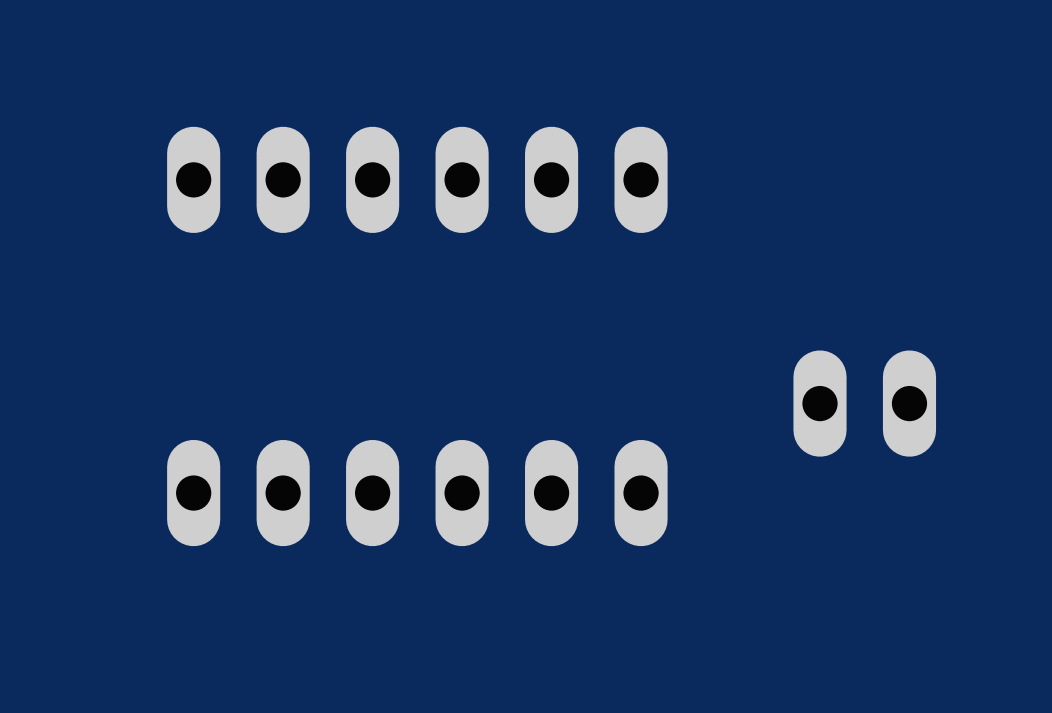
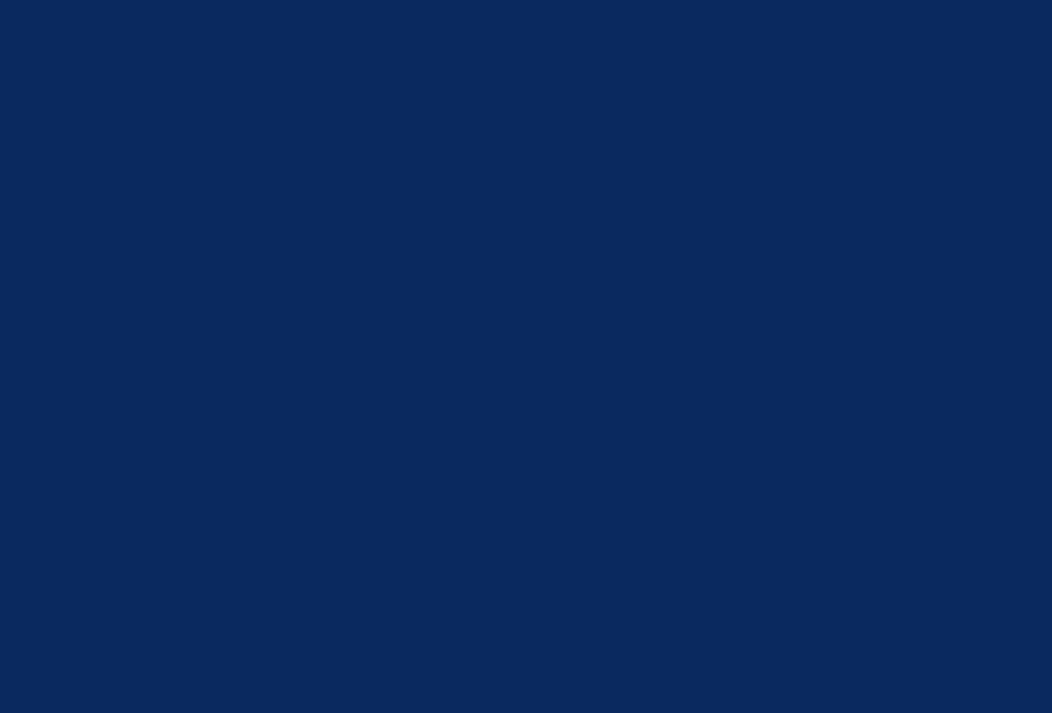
part: (417, 179) -> none
part: (864, 403) -> none
part: (417, 493) -> none

